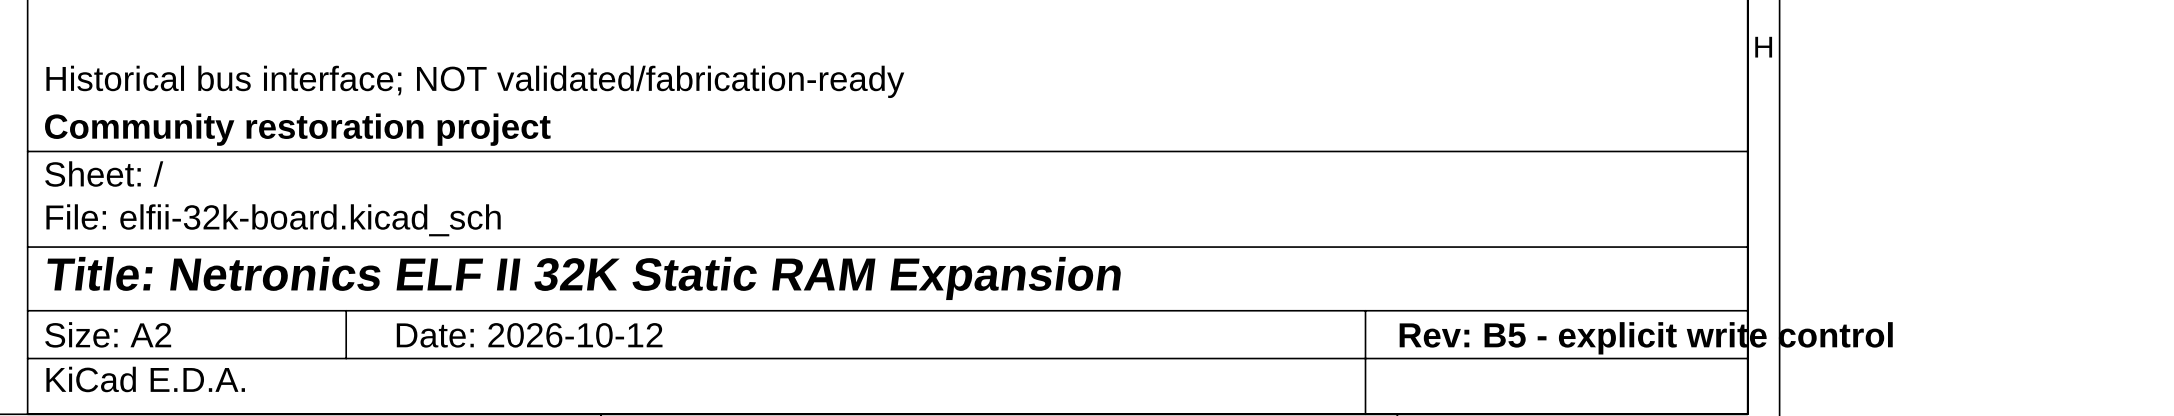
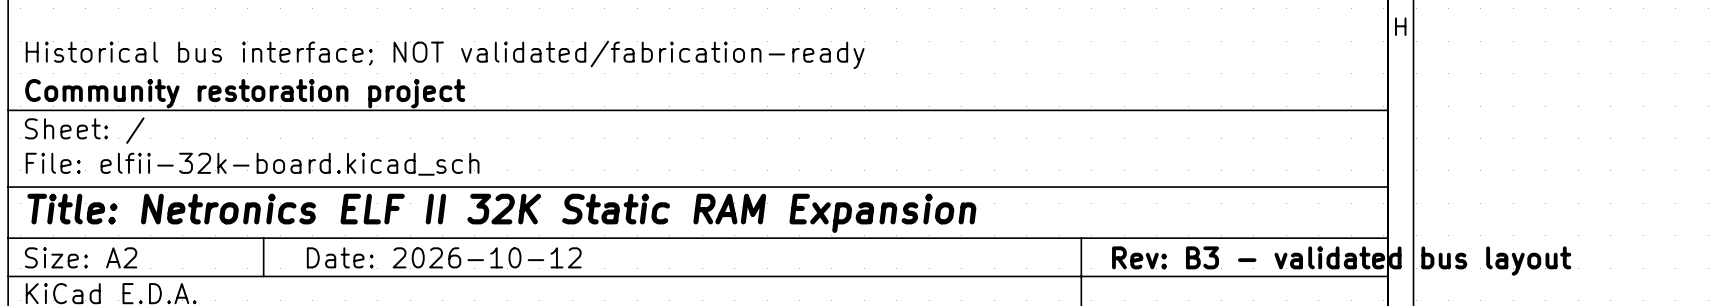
title block: Rev: B5 - explicit write control (1646, 338) -> Rev: B3 - validated bus layout (1341, 261)

